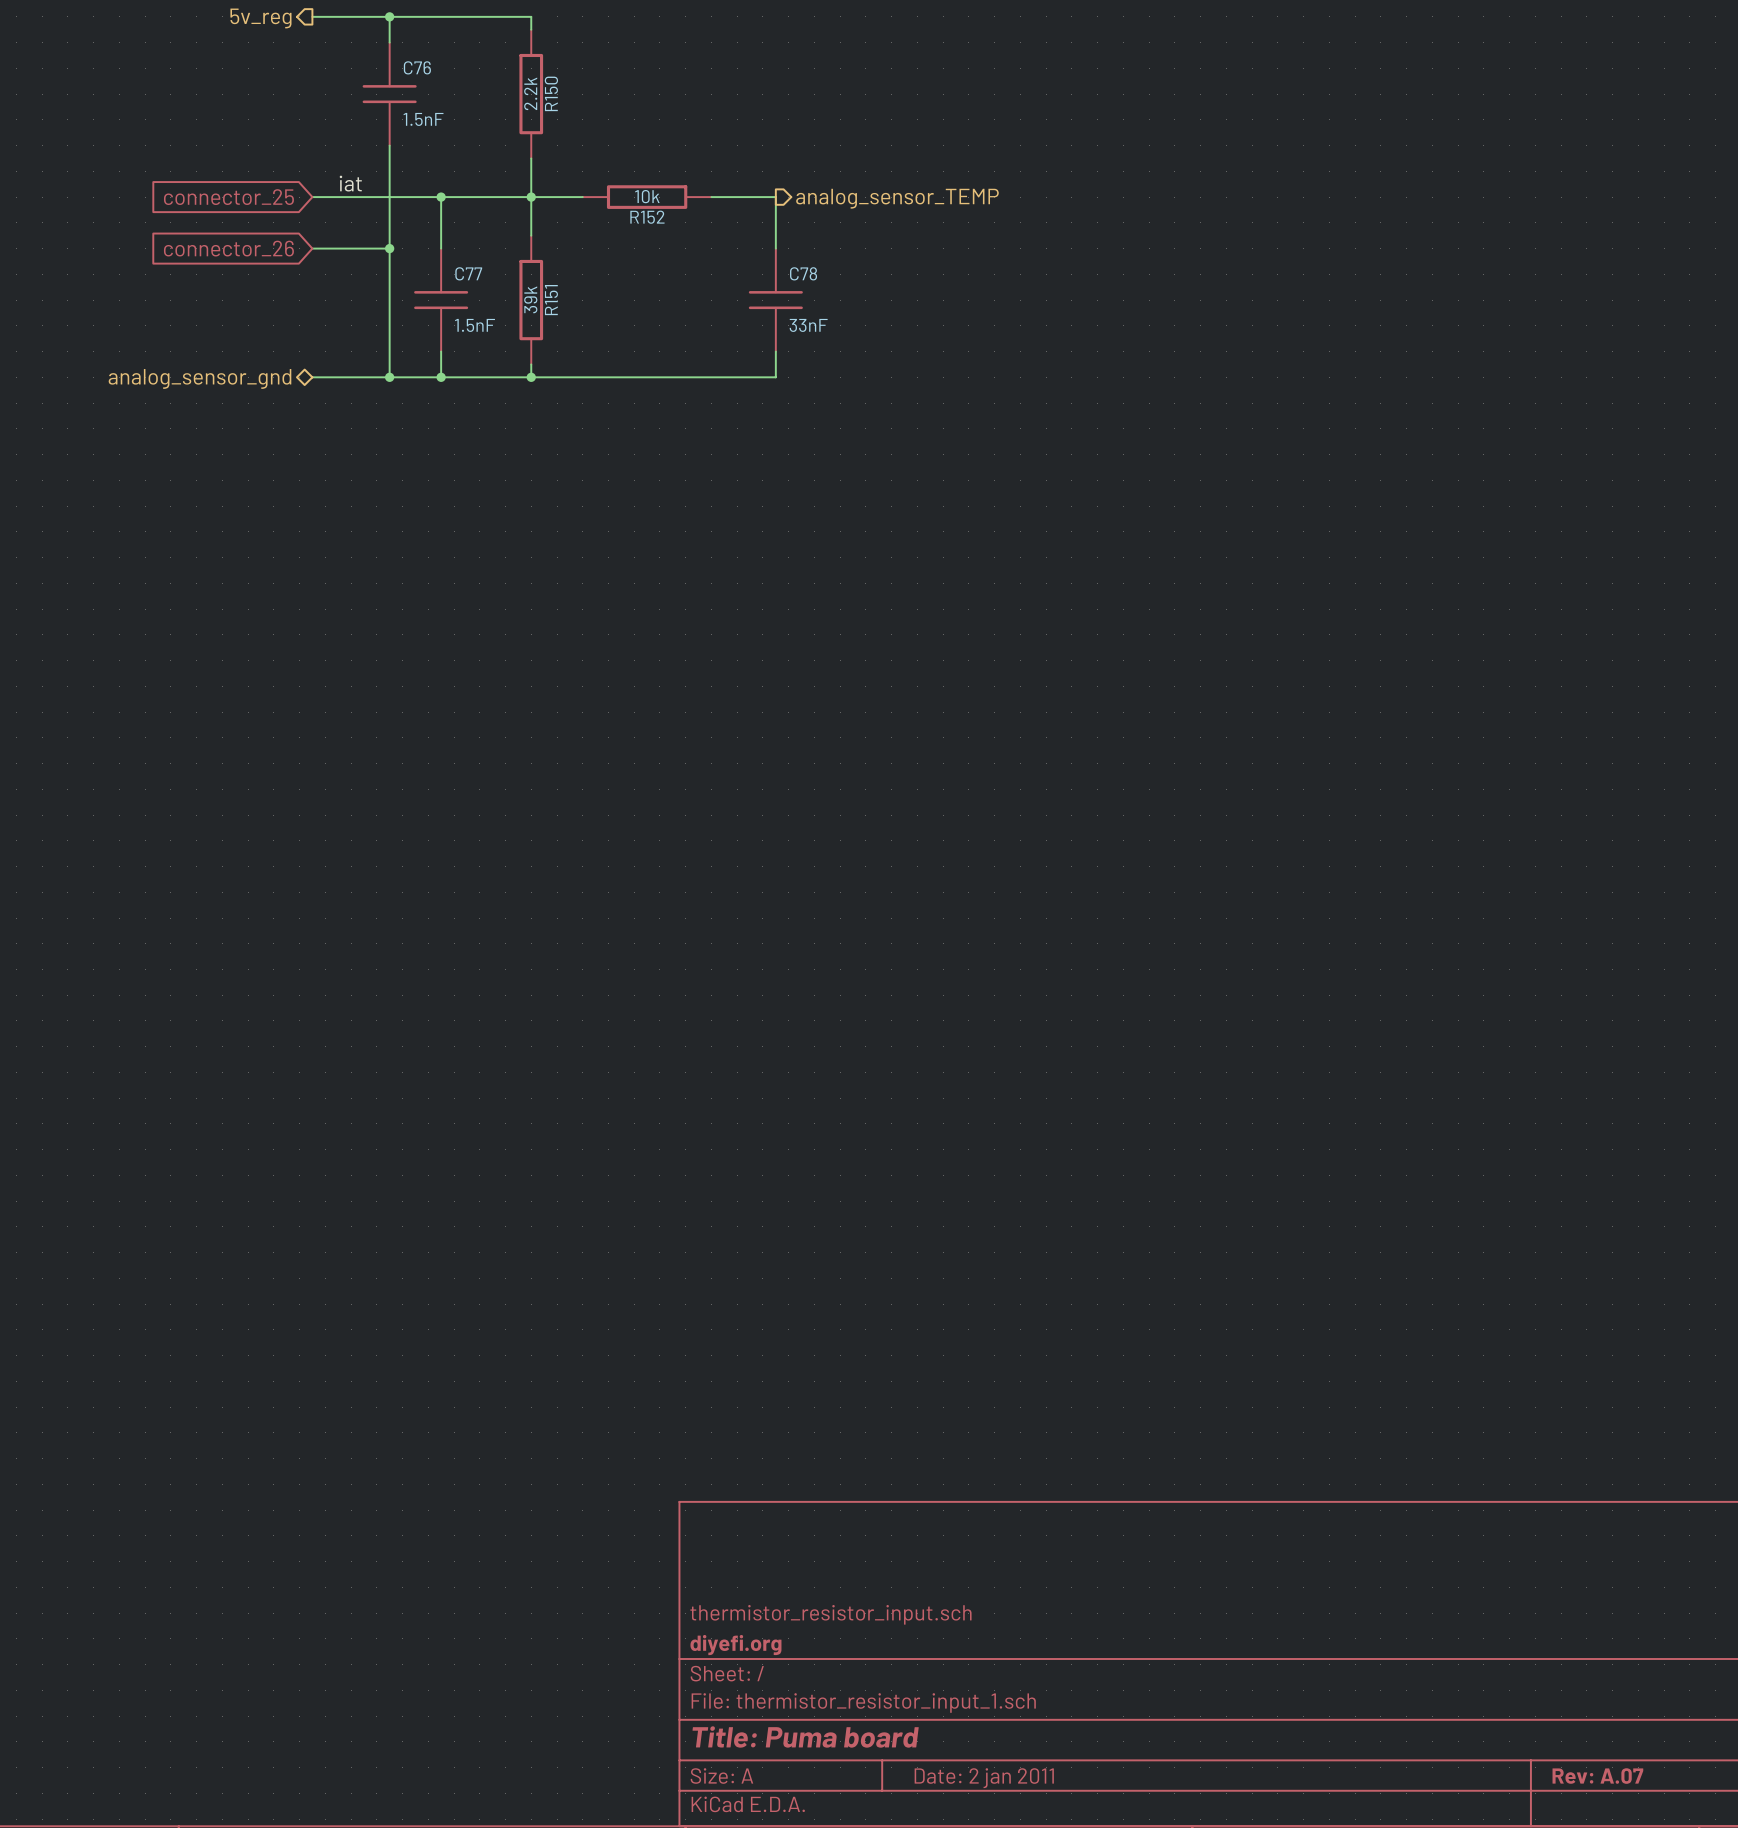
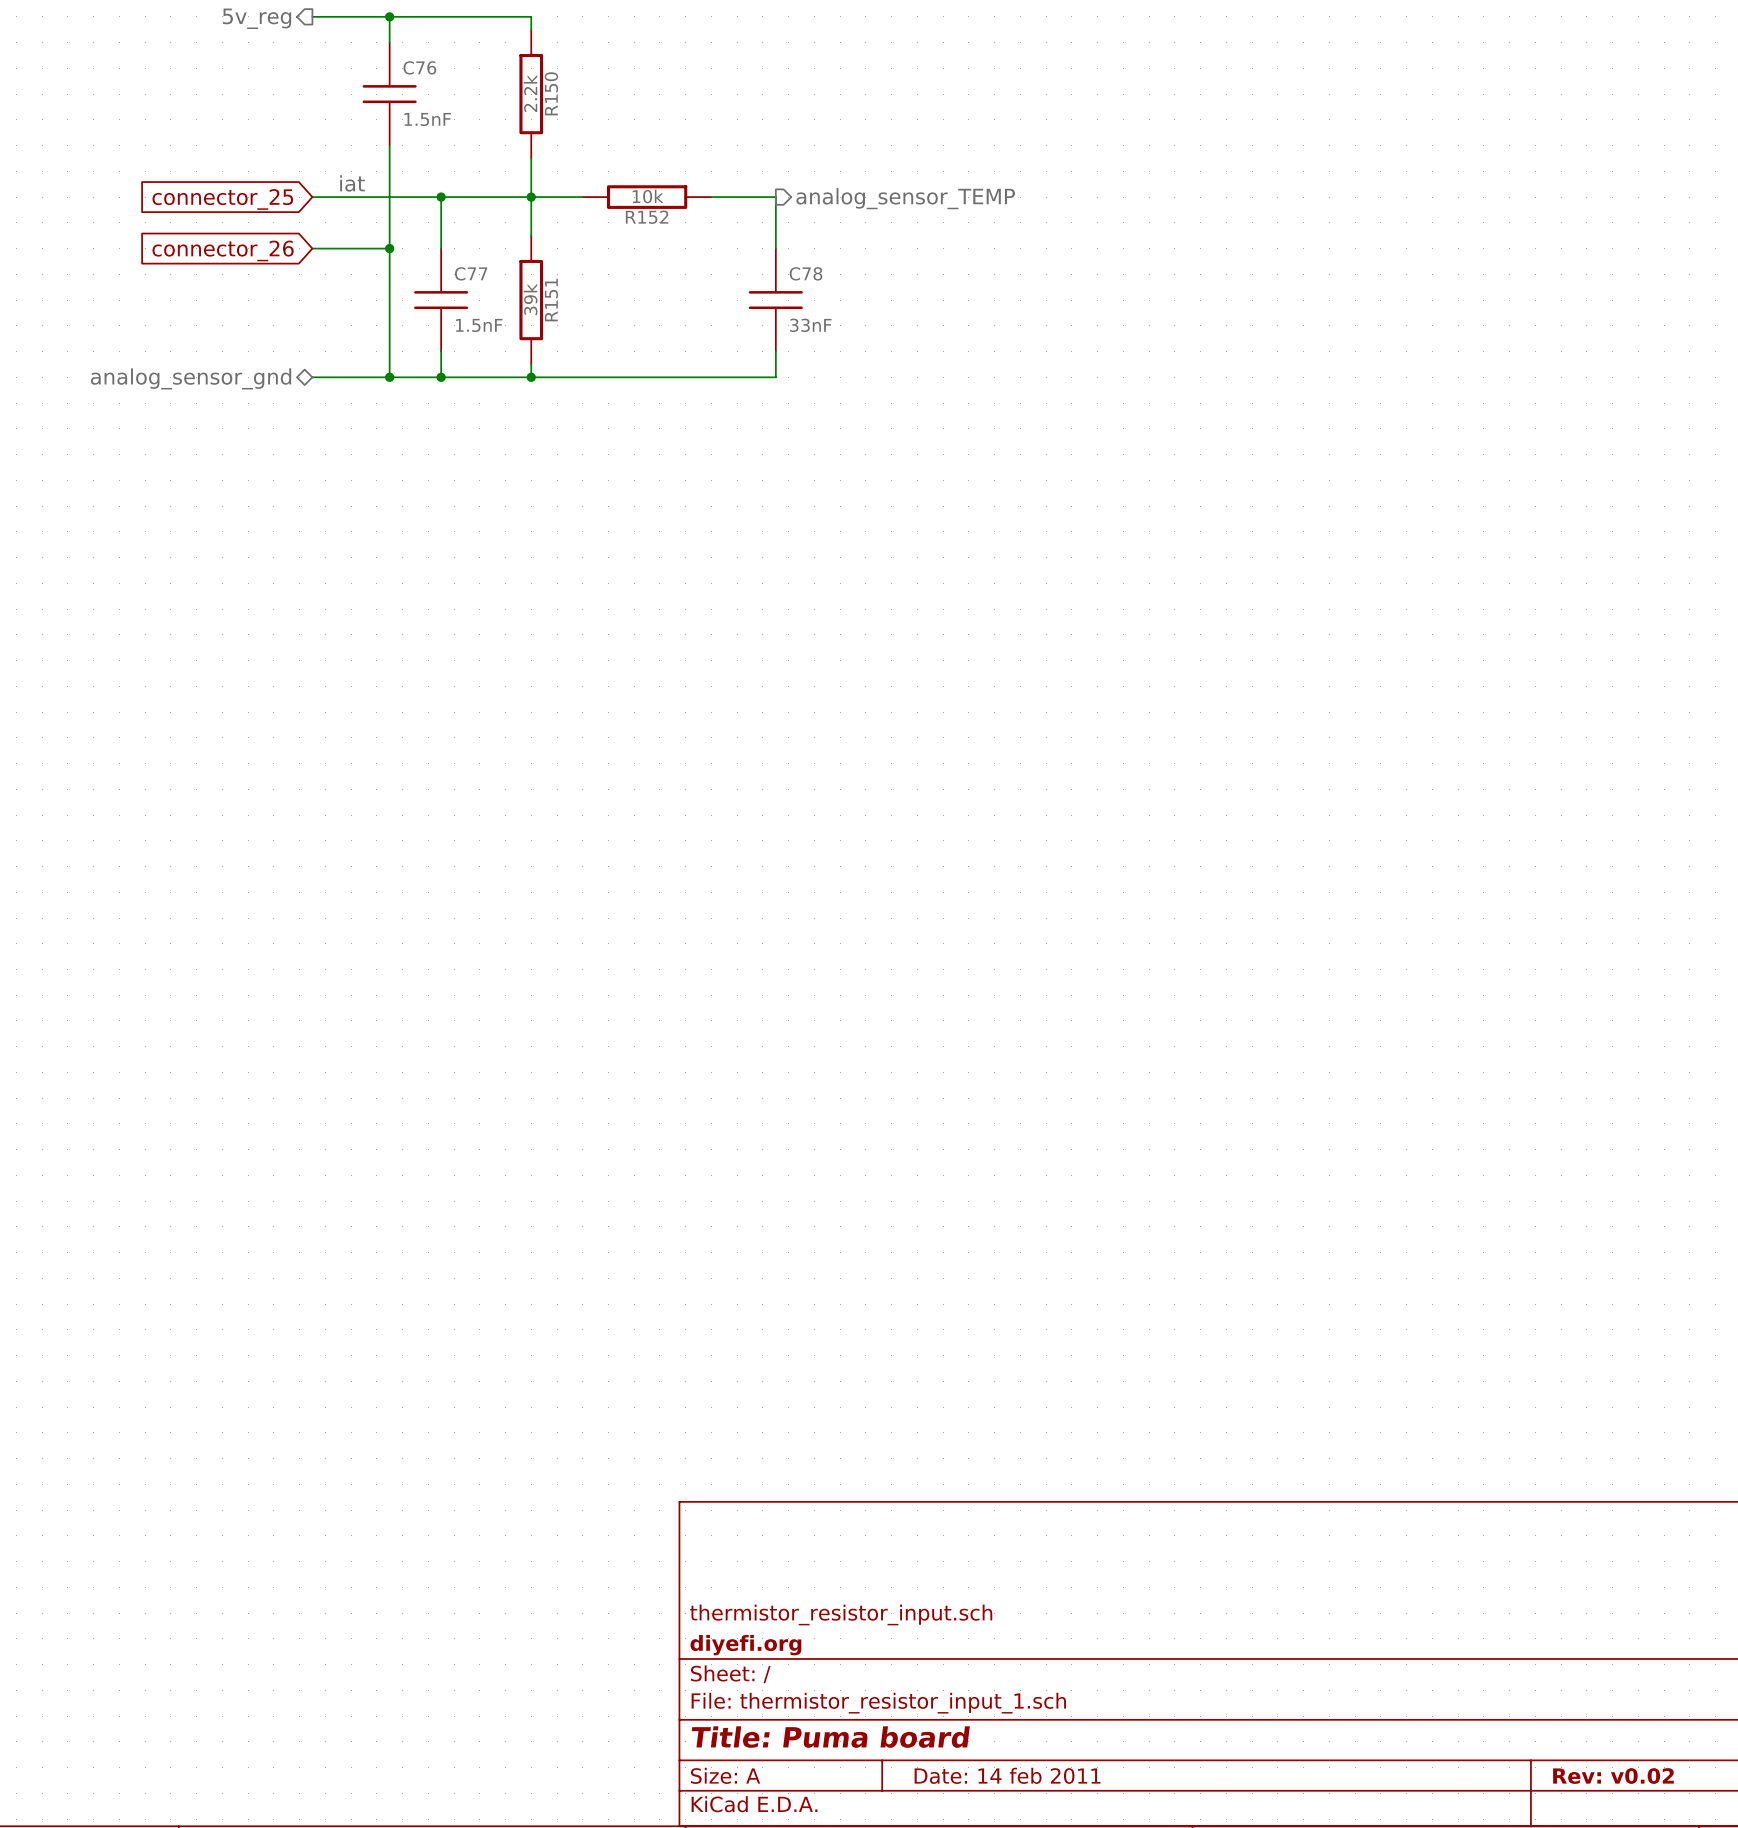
title block: Rev: A.07 (1597, 1776) -> Rev: v0.02 (1613, 1776)
title block: Date: 2 jan 2011 (984, 1778) -> Date: 14 feb 2011 (1007, 1775)

